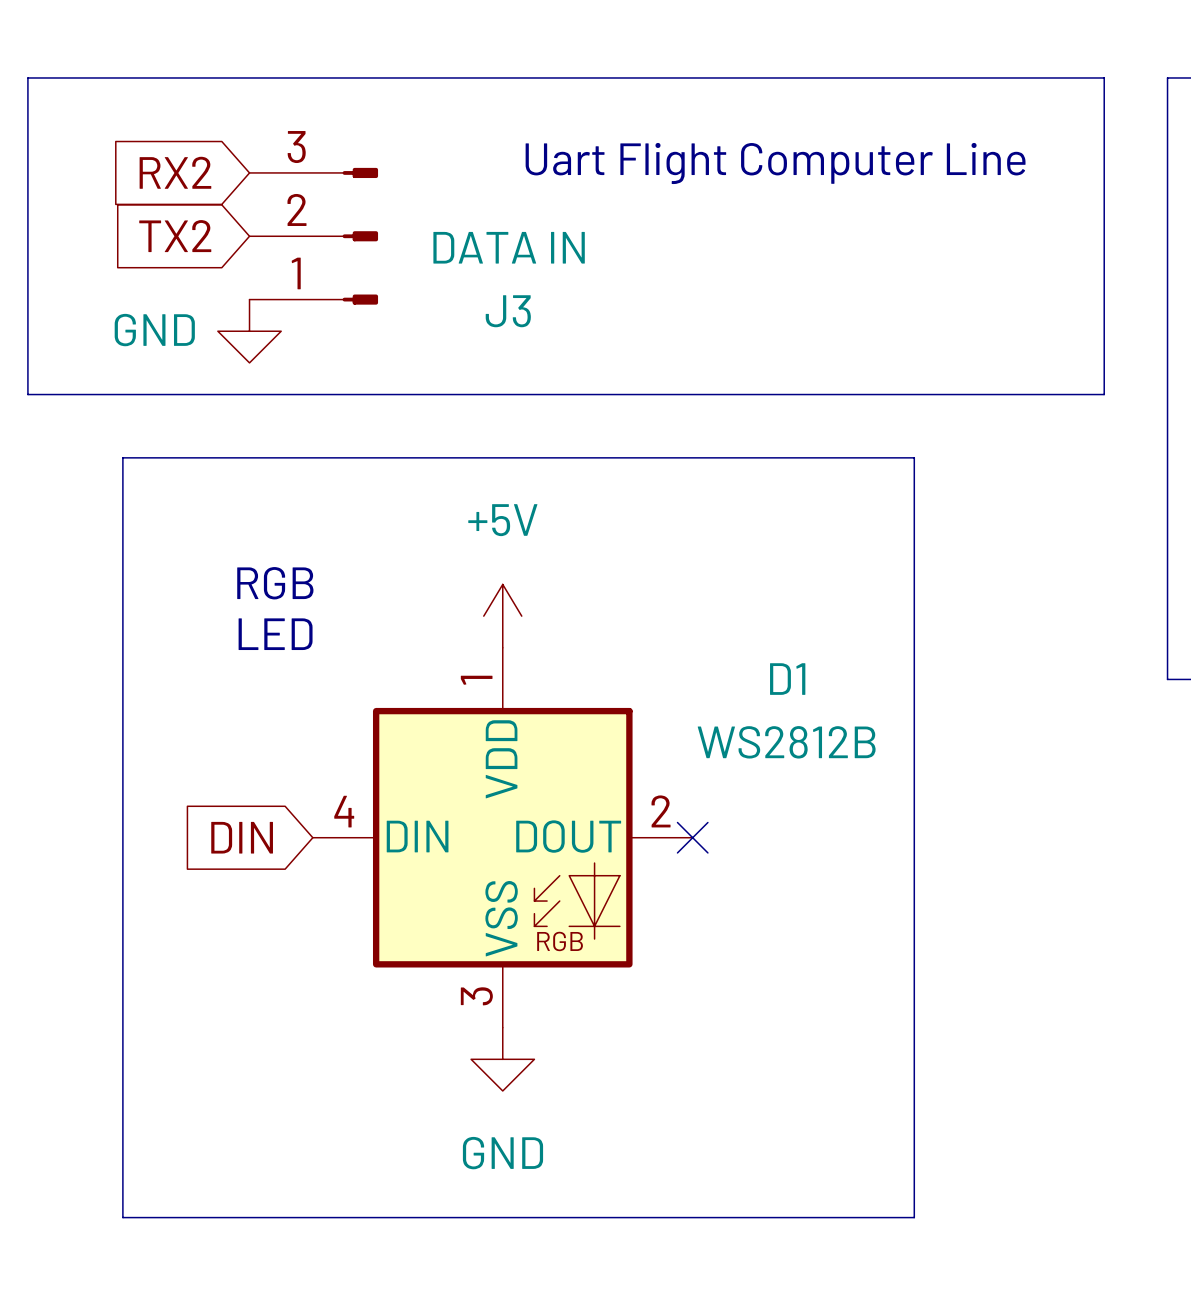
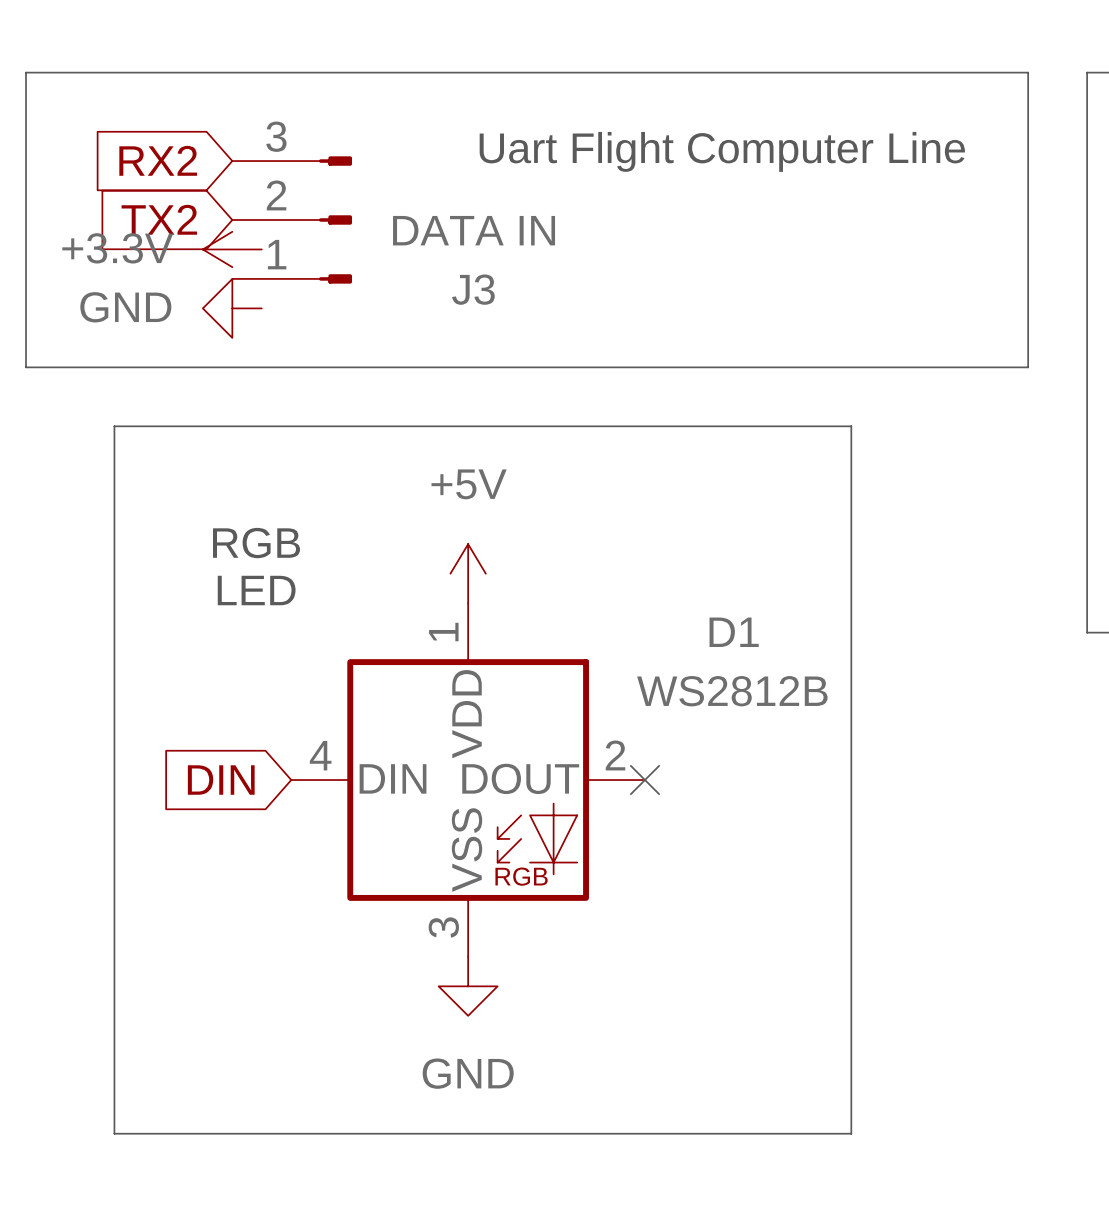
power symbol: none -> +3.3V (232, 249)
power symbol rotation: 0° (249, 331) -> 90° clockwise (232, 308)

